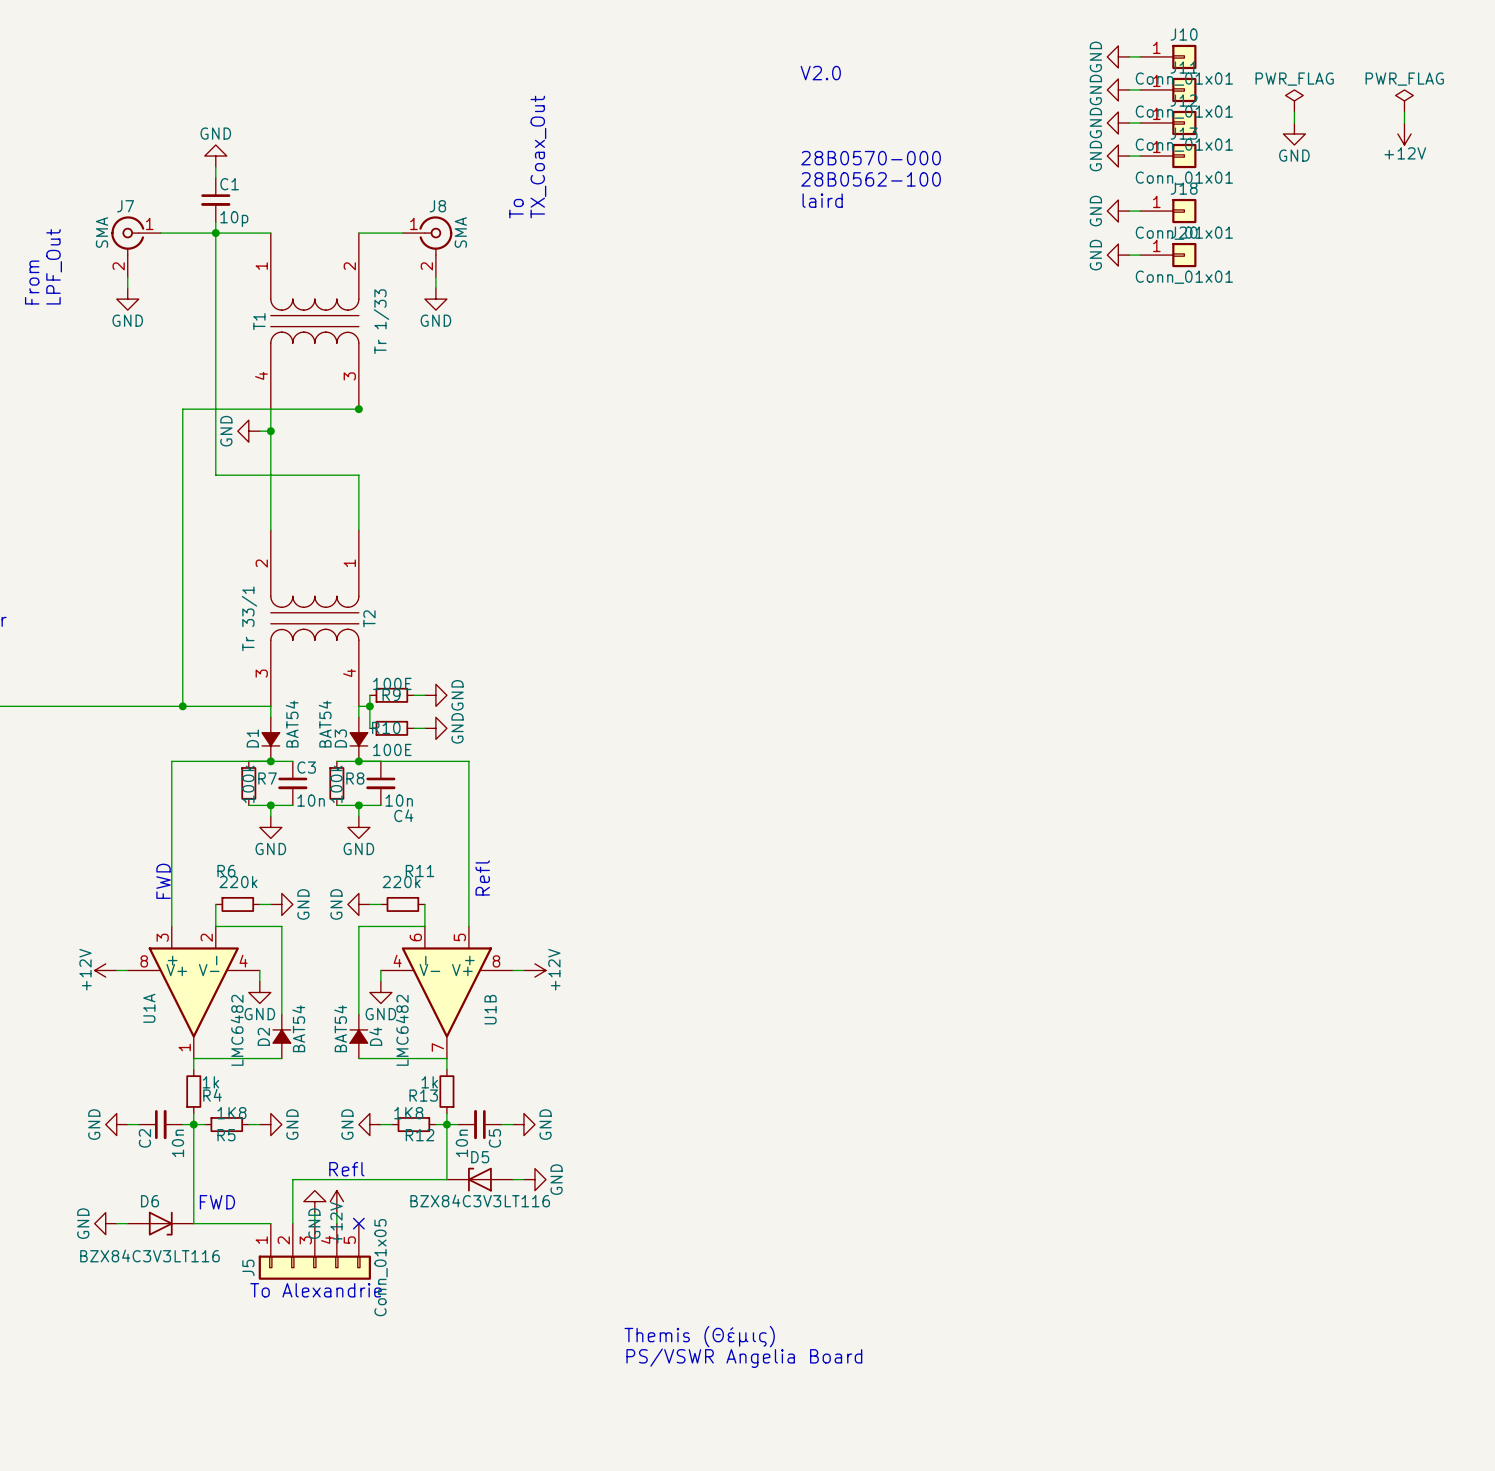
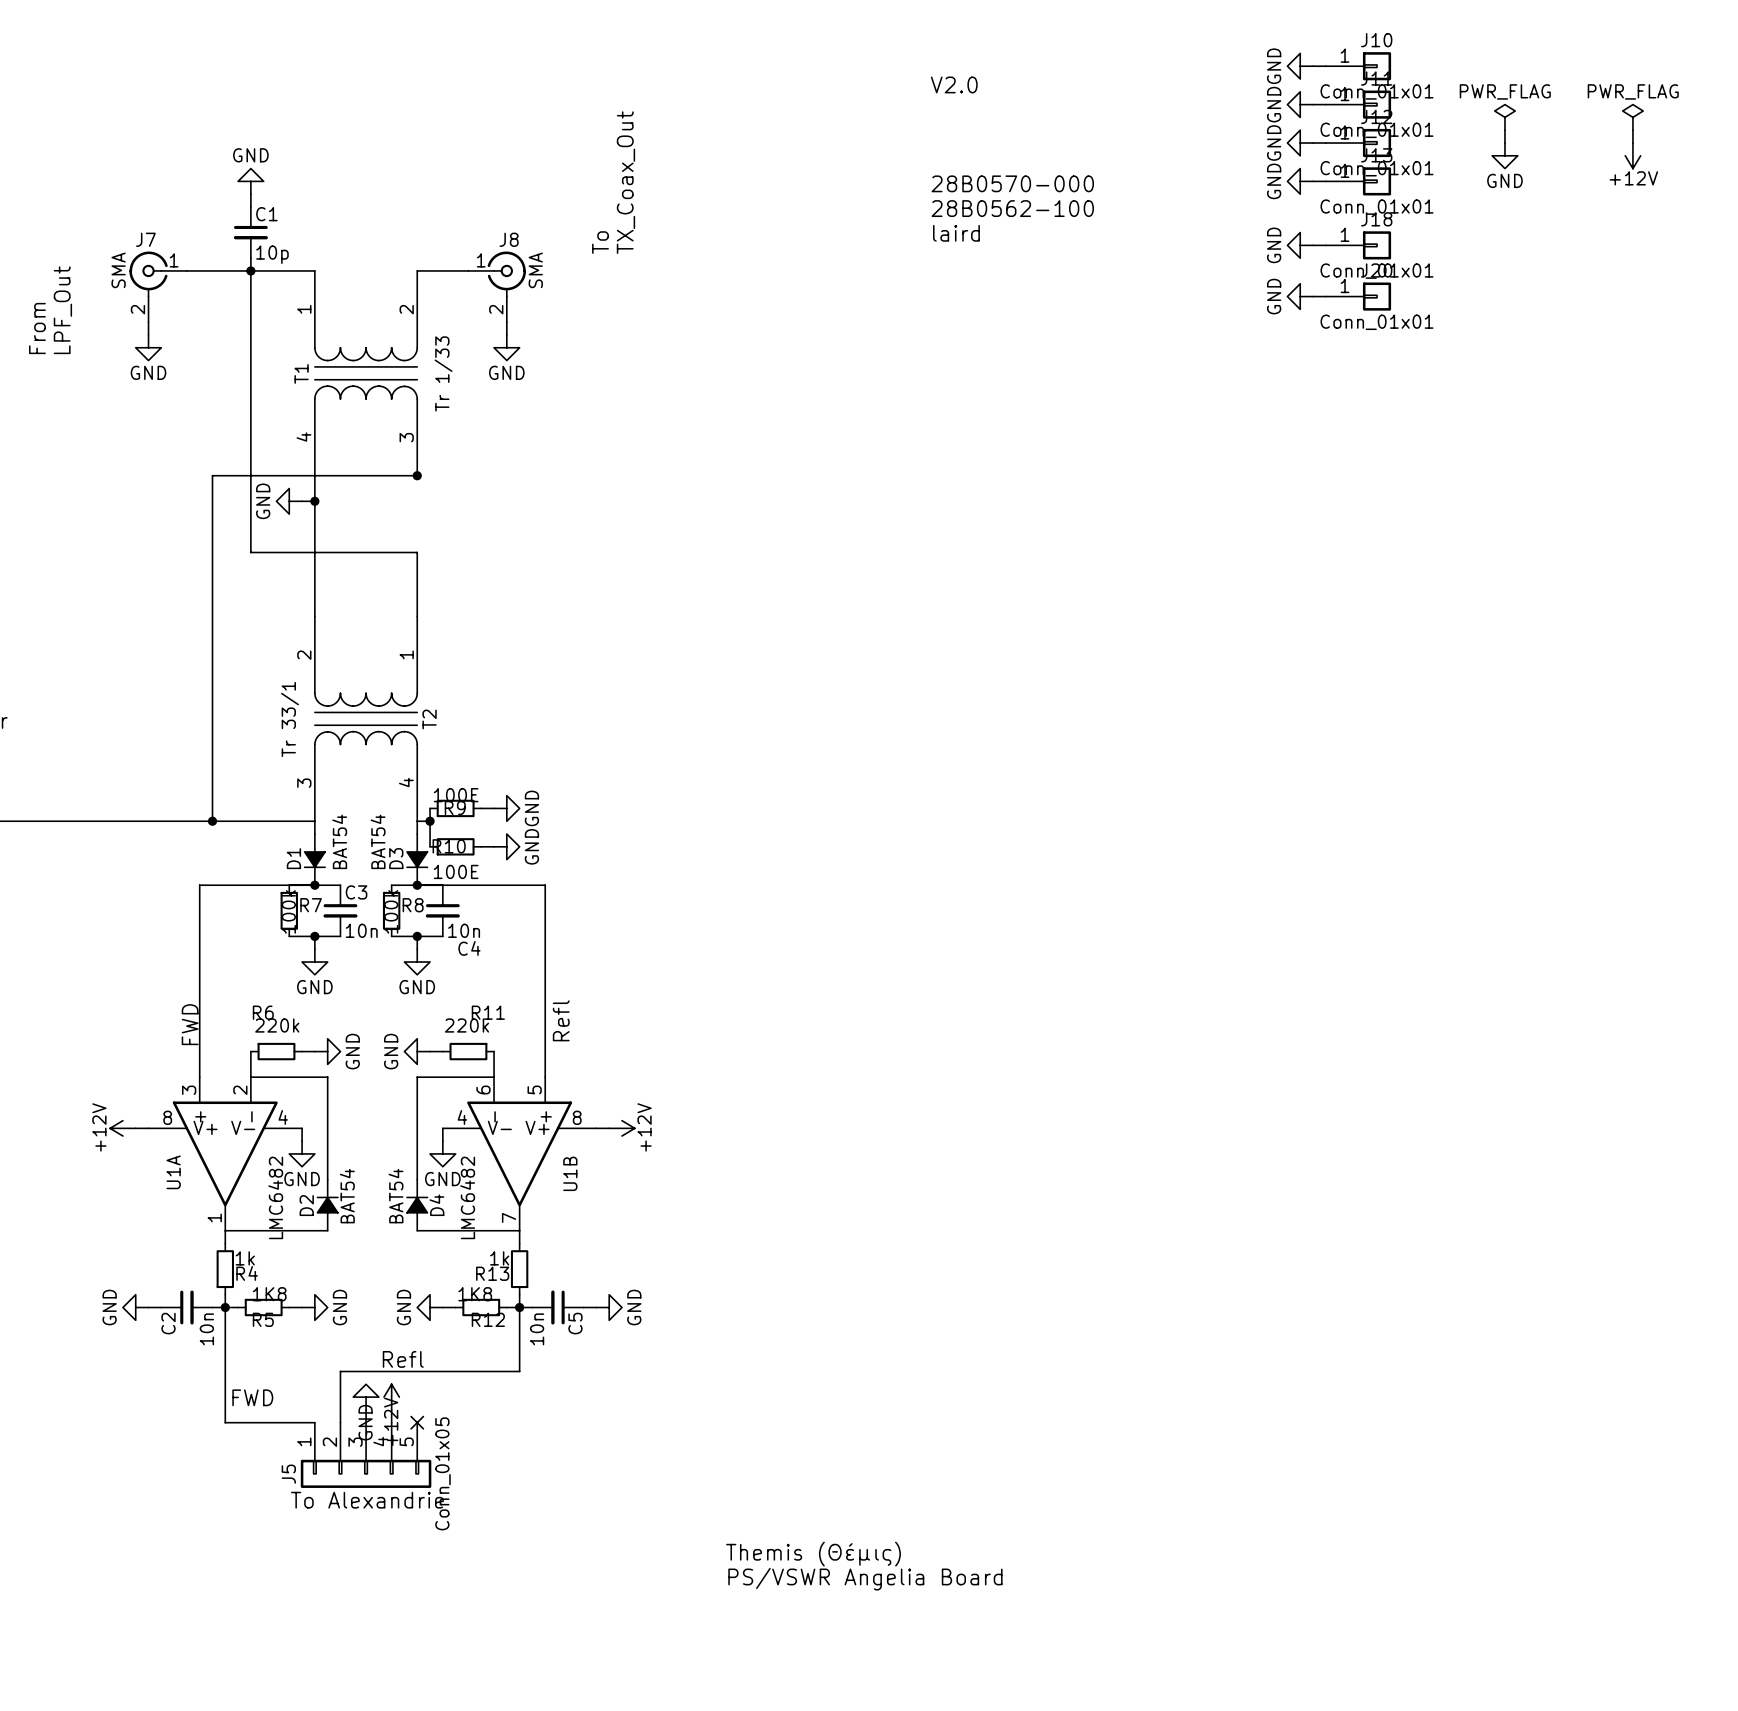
D5: BZX84C3V3LT116 (479, 1179) -> none
wire: (512, 1179) (523, 1179) -> none
power symbol: GND (534, 1179) -> none
power symbol: GND (105, 1223) -> none
wire: (116, 1223) (127, 1223) -> none
D6: BZX84C3V3LT116 (160, 1223) -> none

